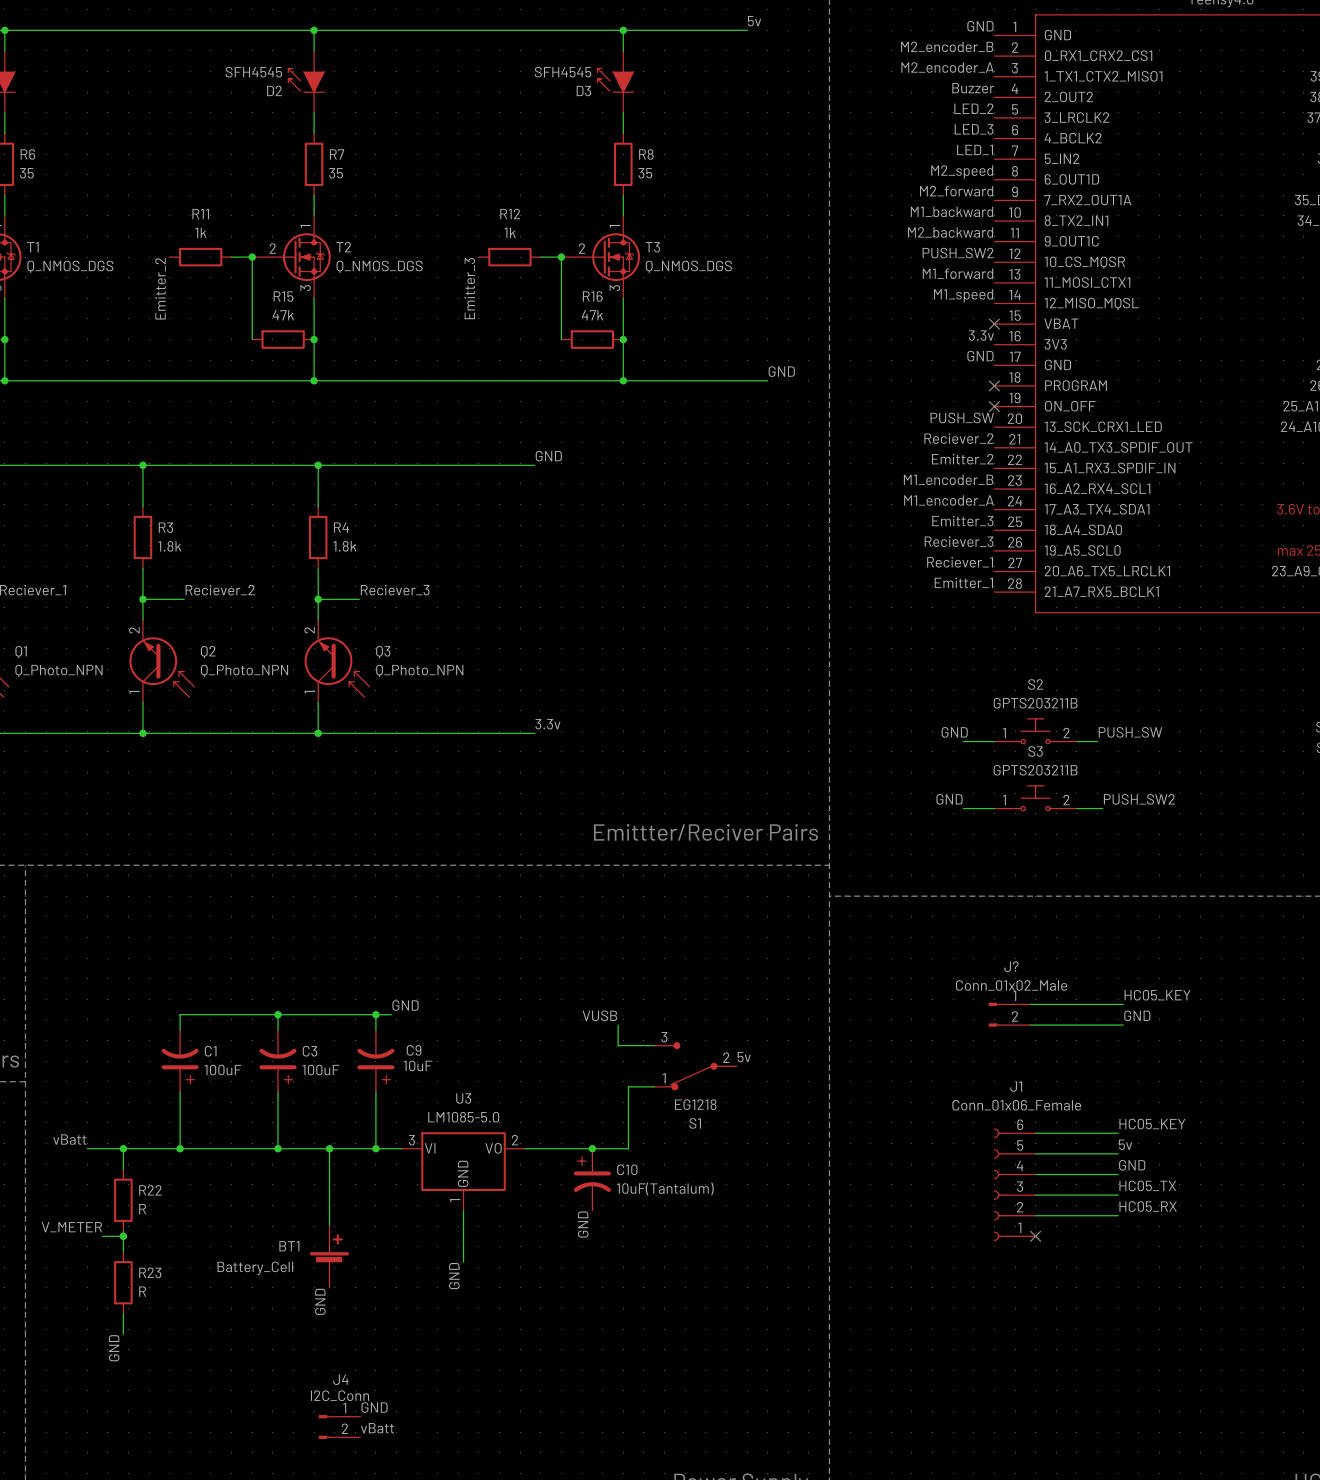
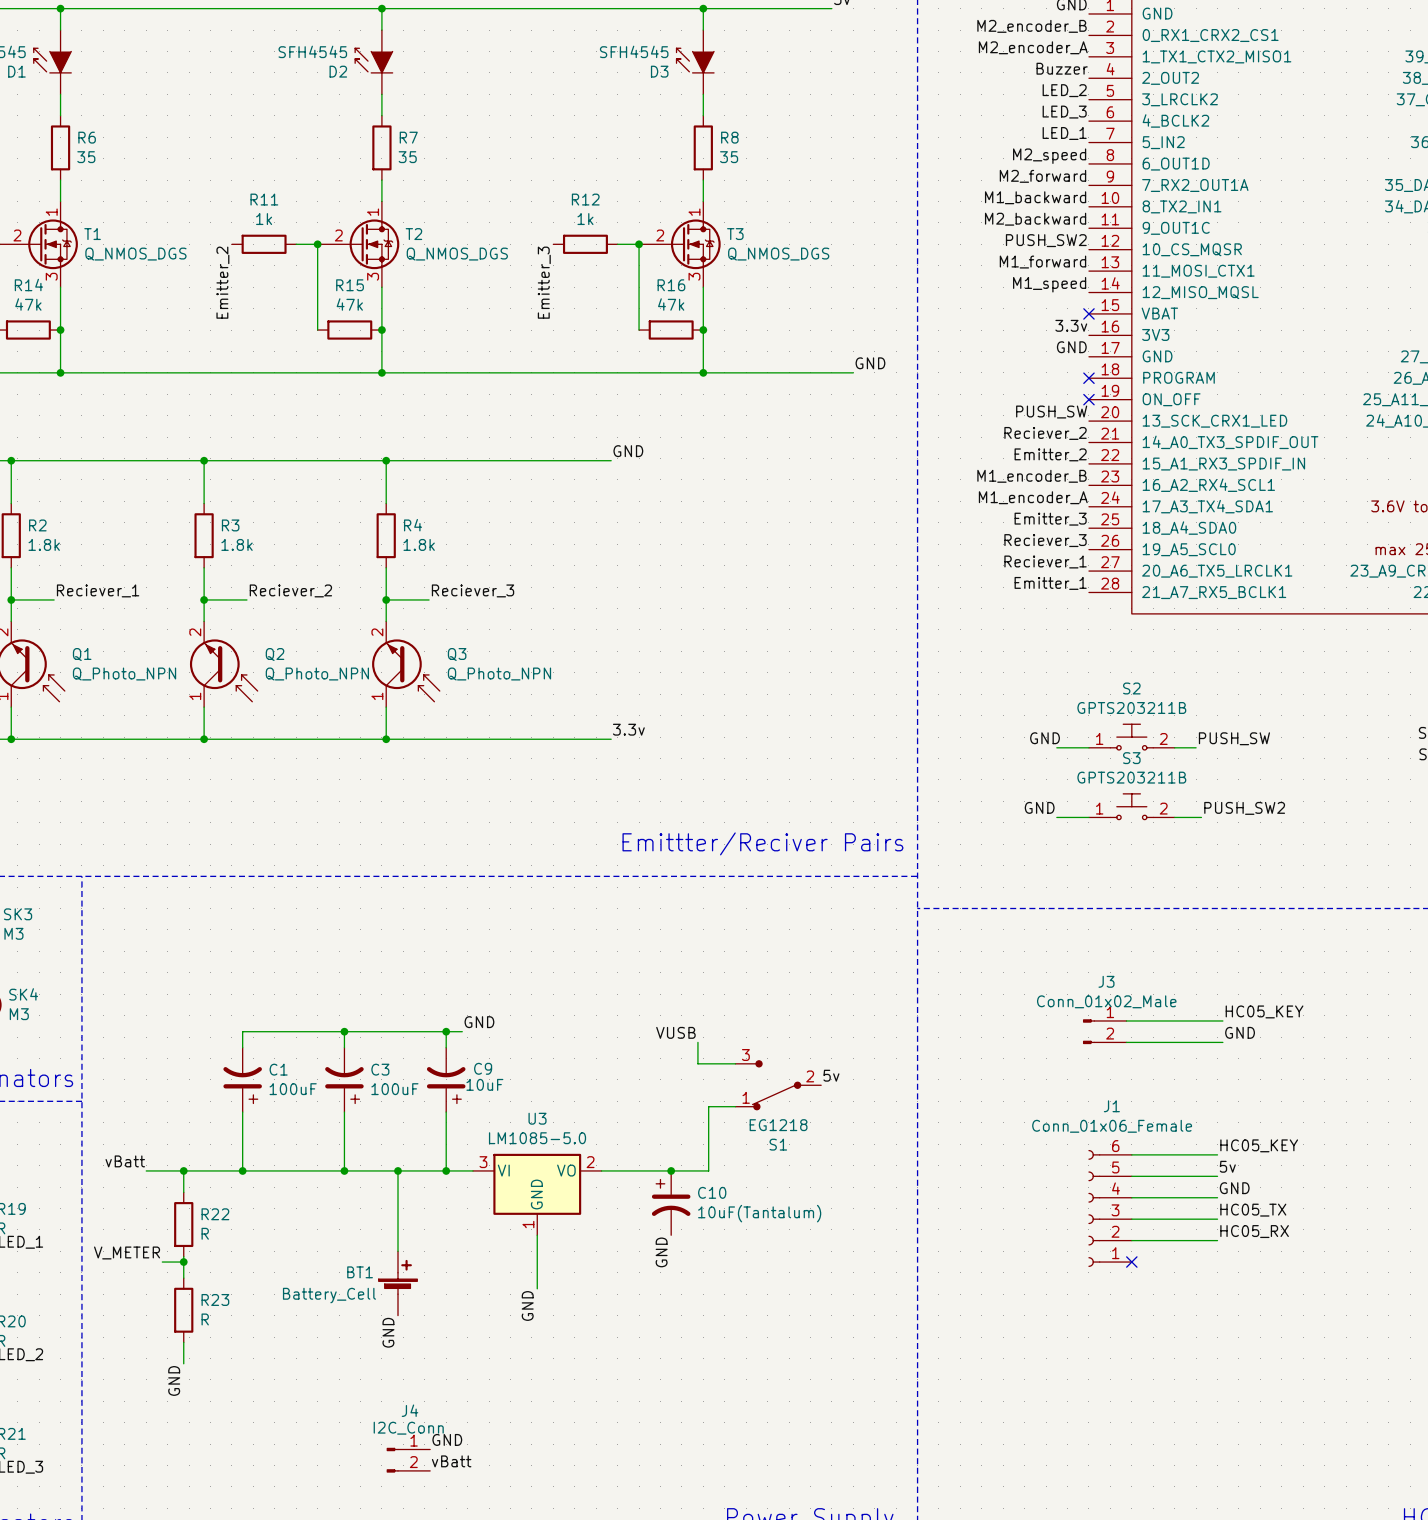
J? name: J? (1011, 966) -> J3 (1106, 981)

